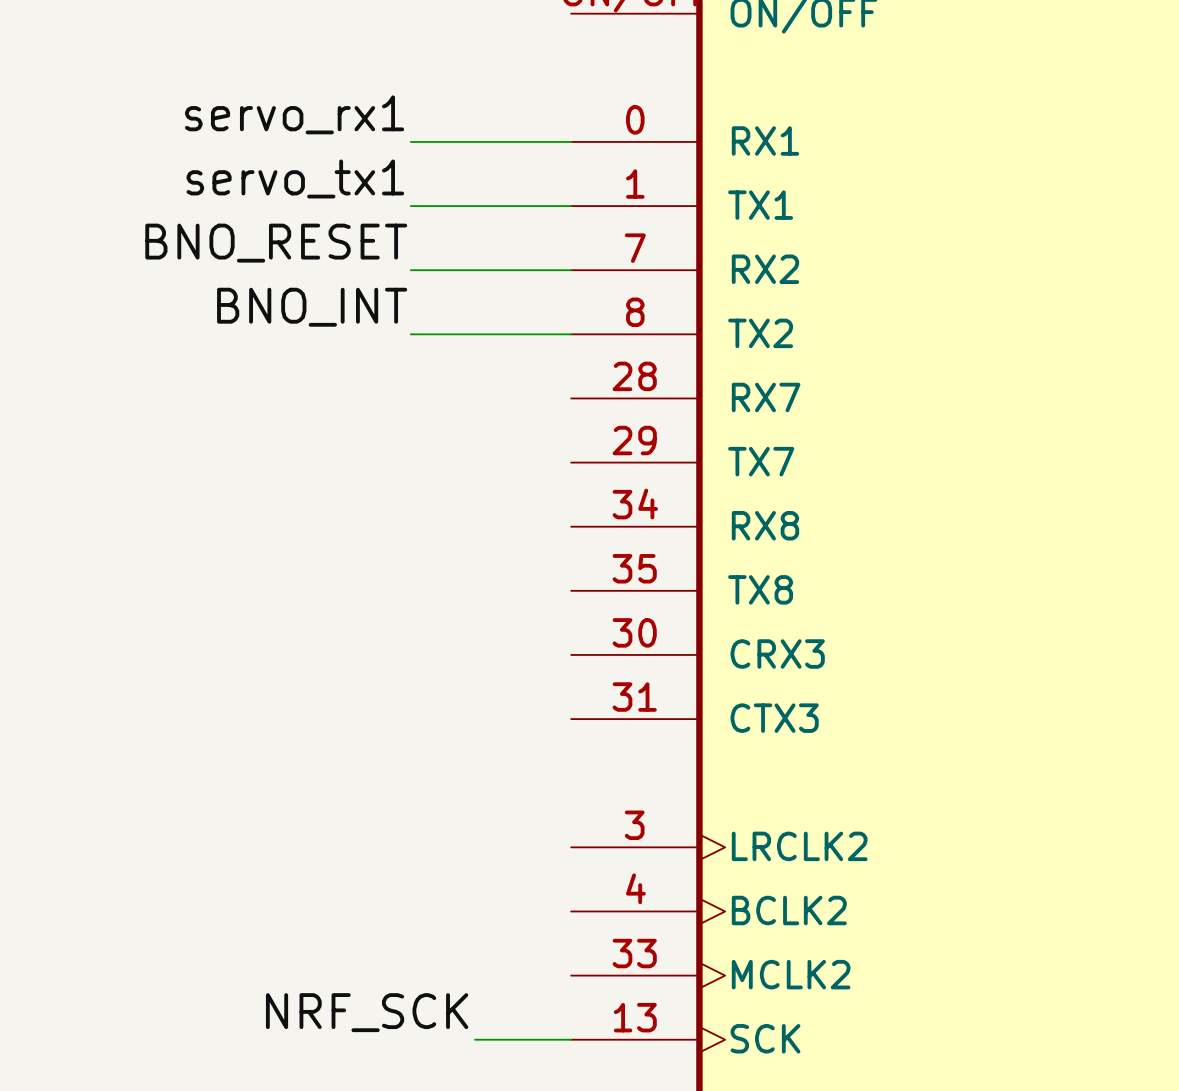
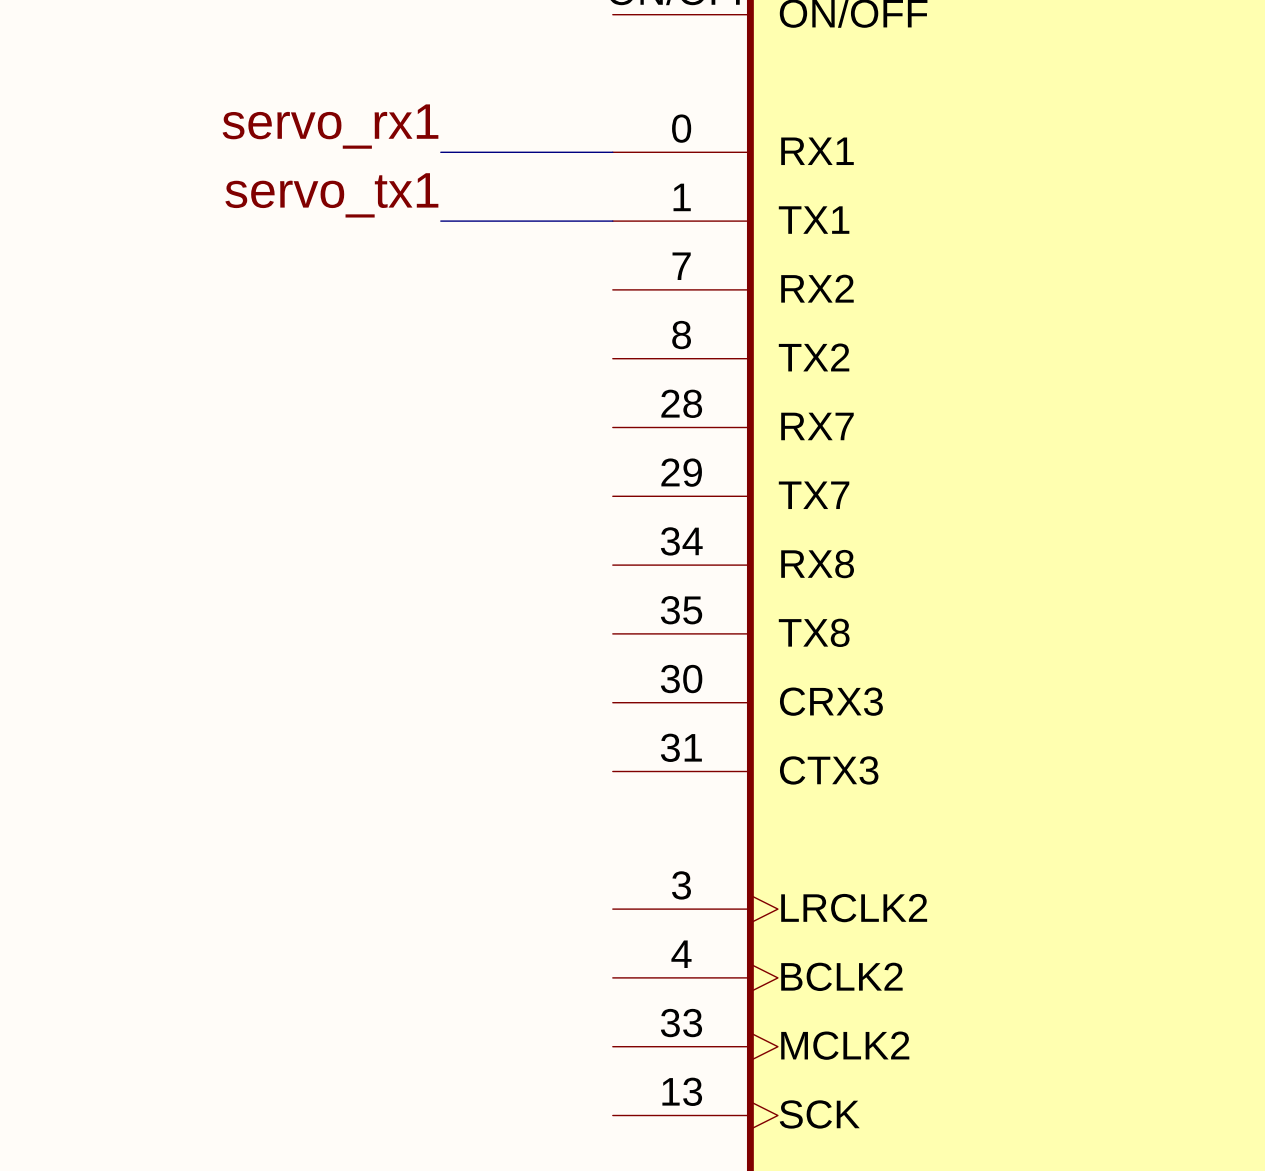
label: BNO_RESET (276, 243) -> none
wire: (410, 270) (571, 270) -> none
label: BNO_INT (312, 307) -> none
wire: (410, 334) (571, 334) -> none
label: NRF_SCK (367, 1012) -> none
wire: (474, 1039) (571, 1039) -> none

